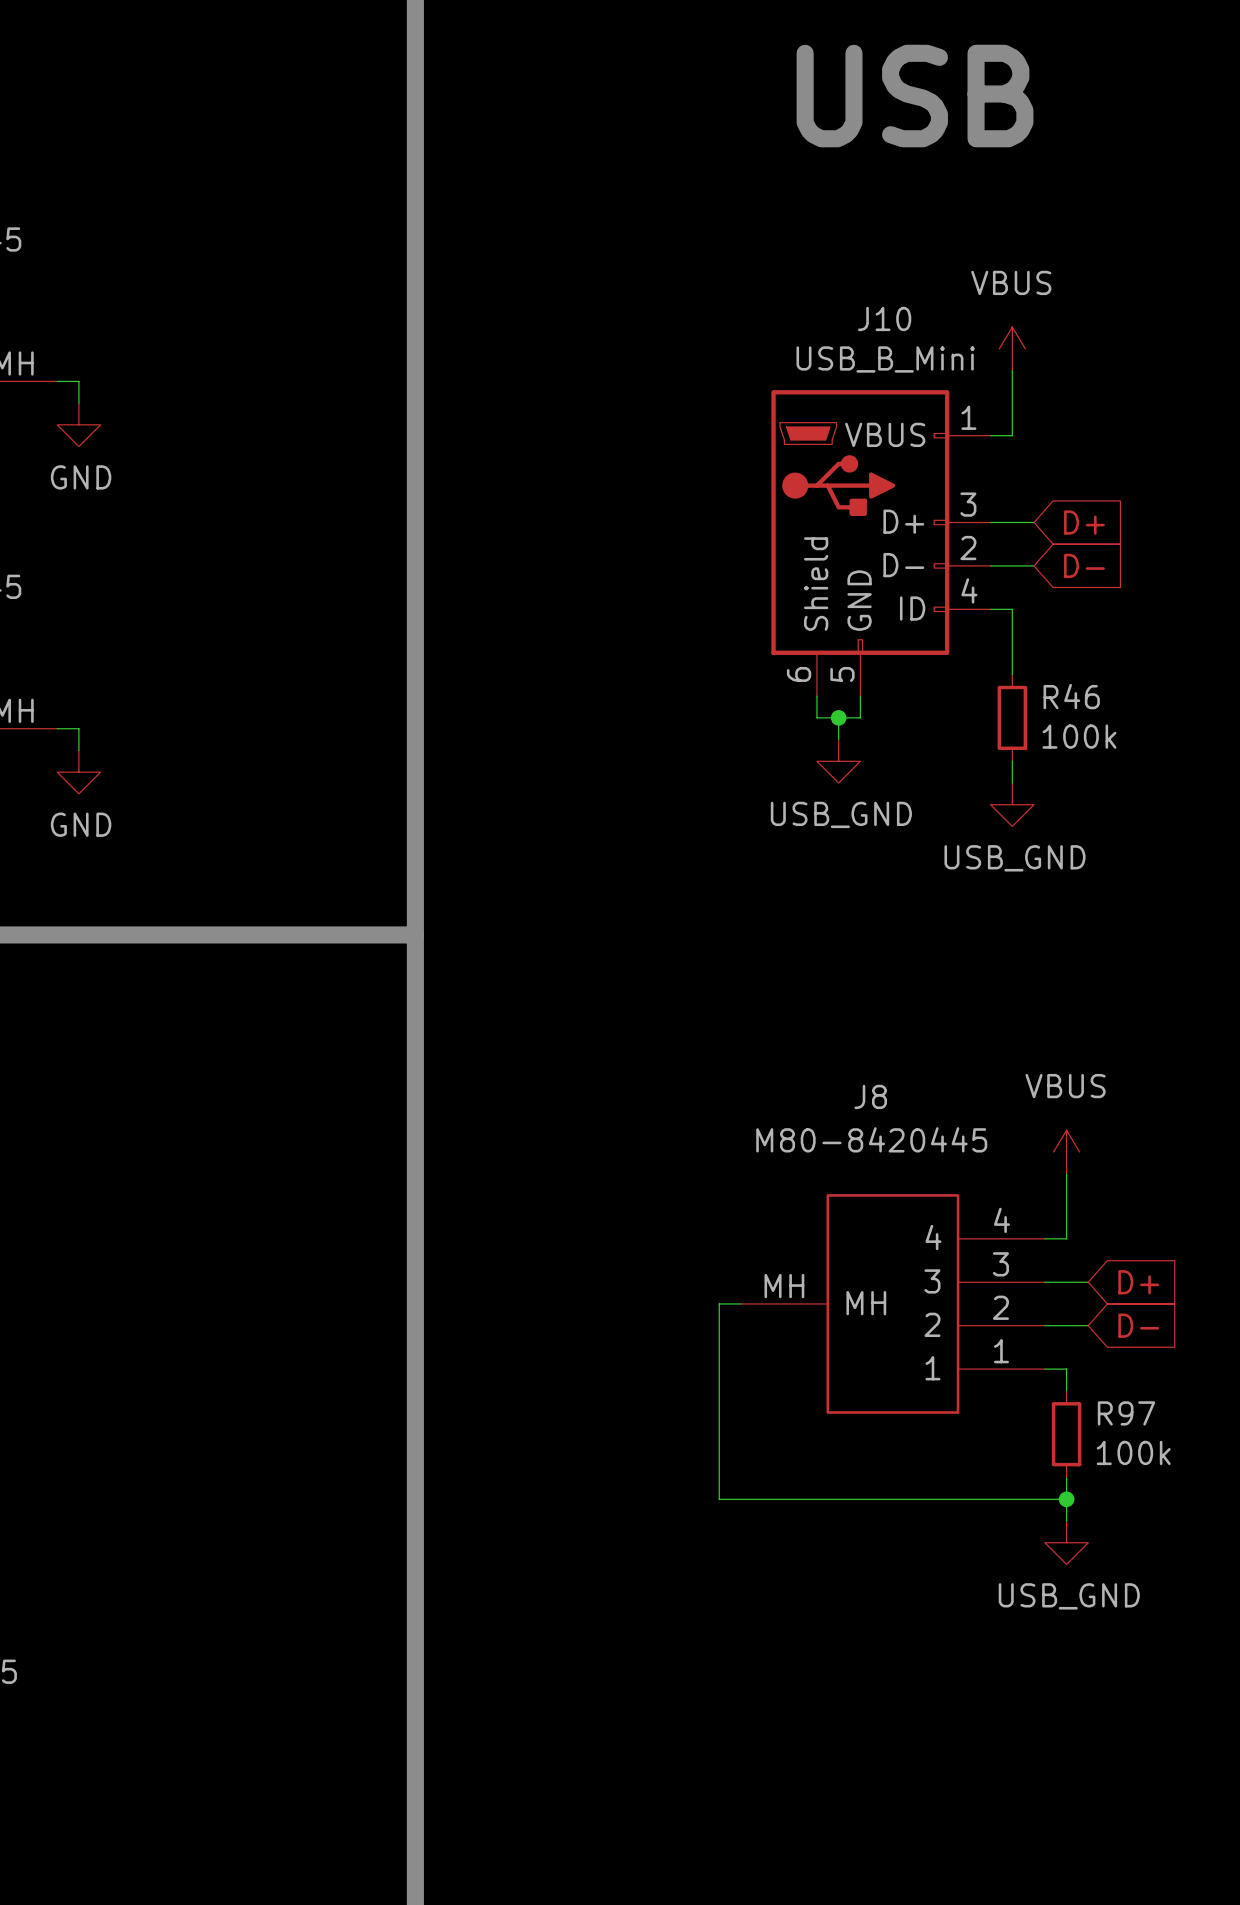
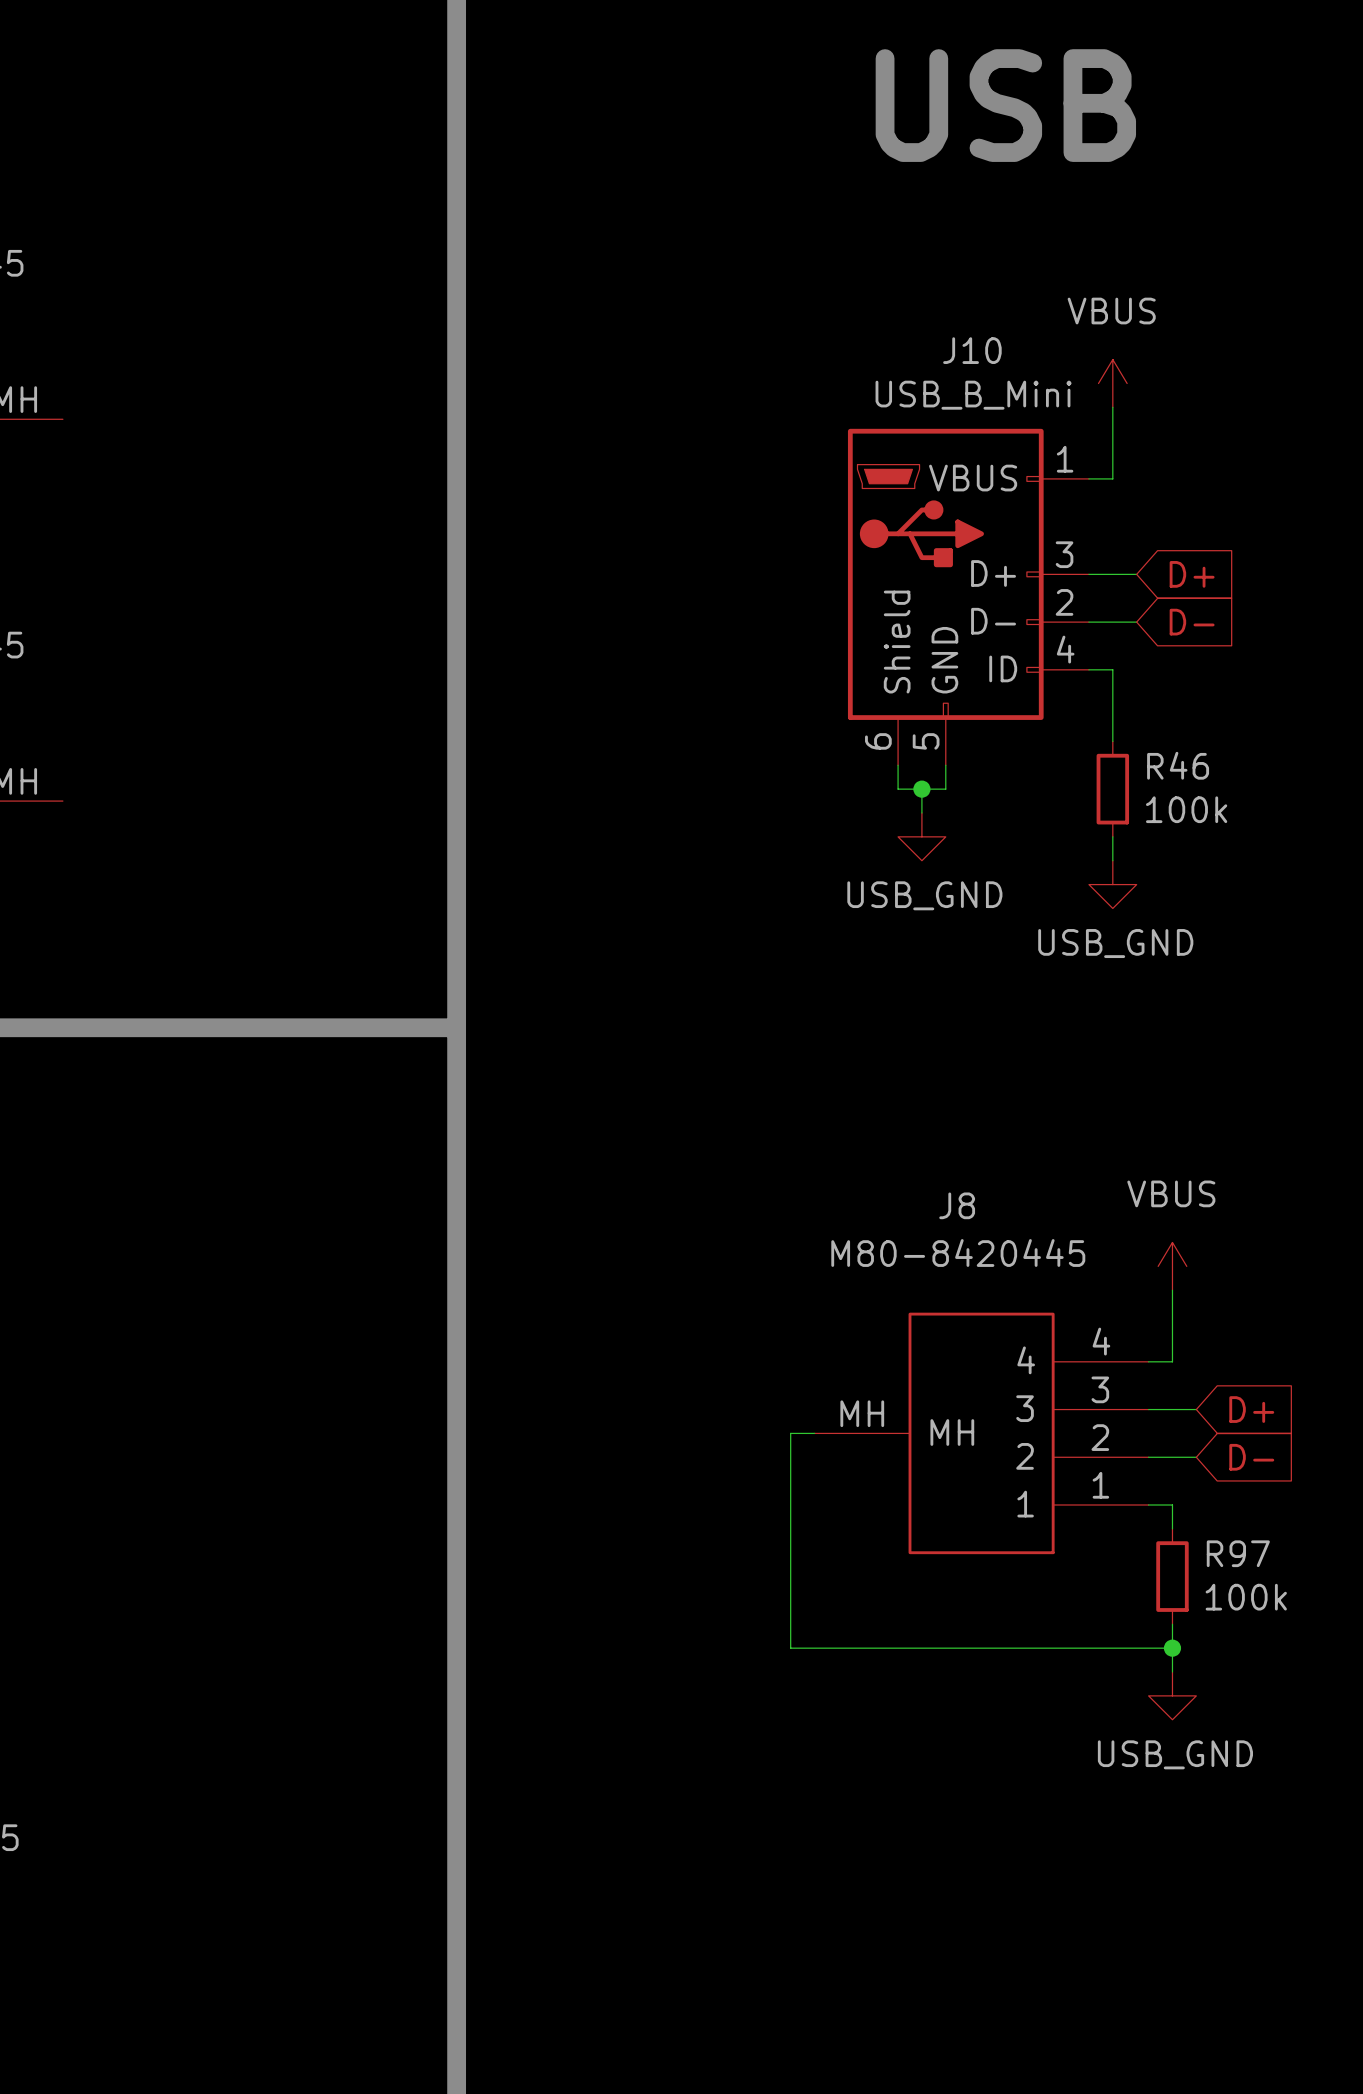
wire: (57, 381) (78, 381) (78, 403) -> none
power symbol: GND (78, 424) -> none
wire: (57, 728) (78, 728) (78, 750) -> none
power symbol: GND (78, 772) -> none

